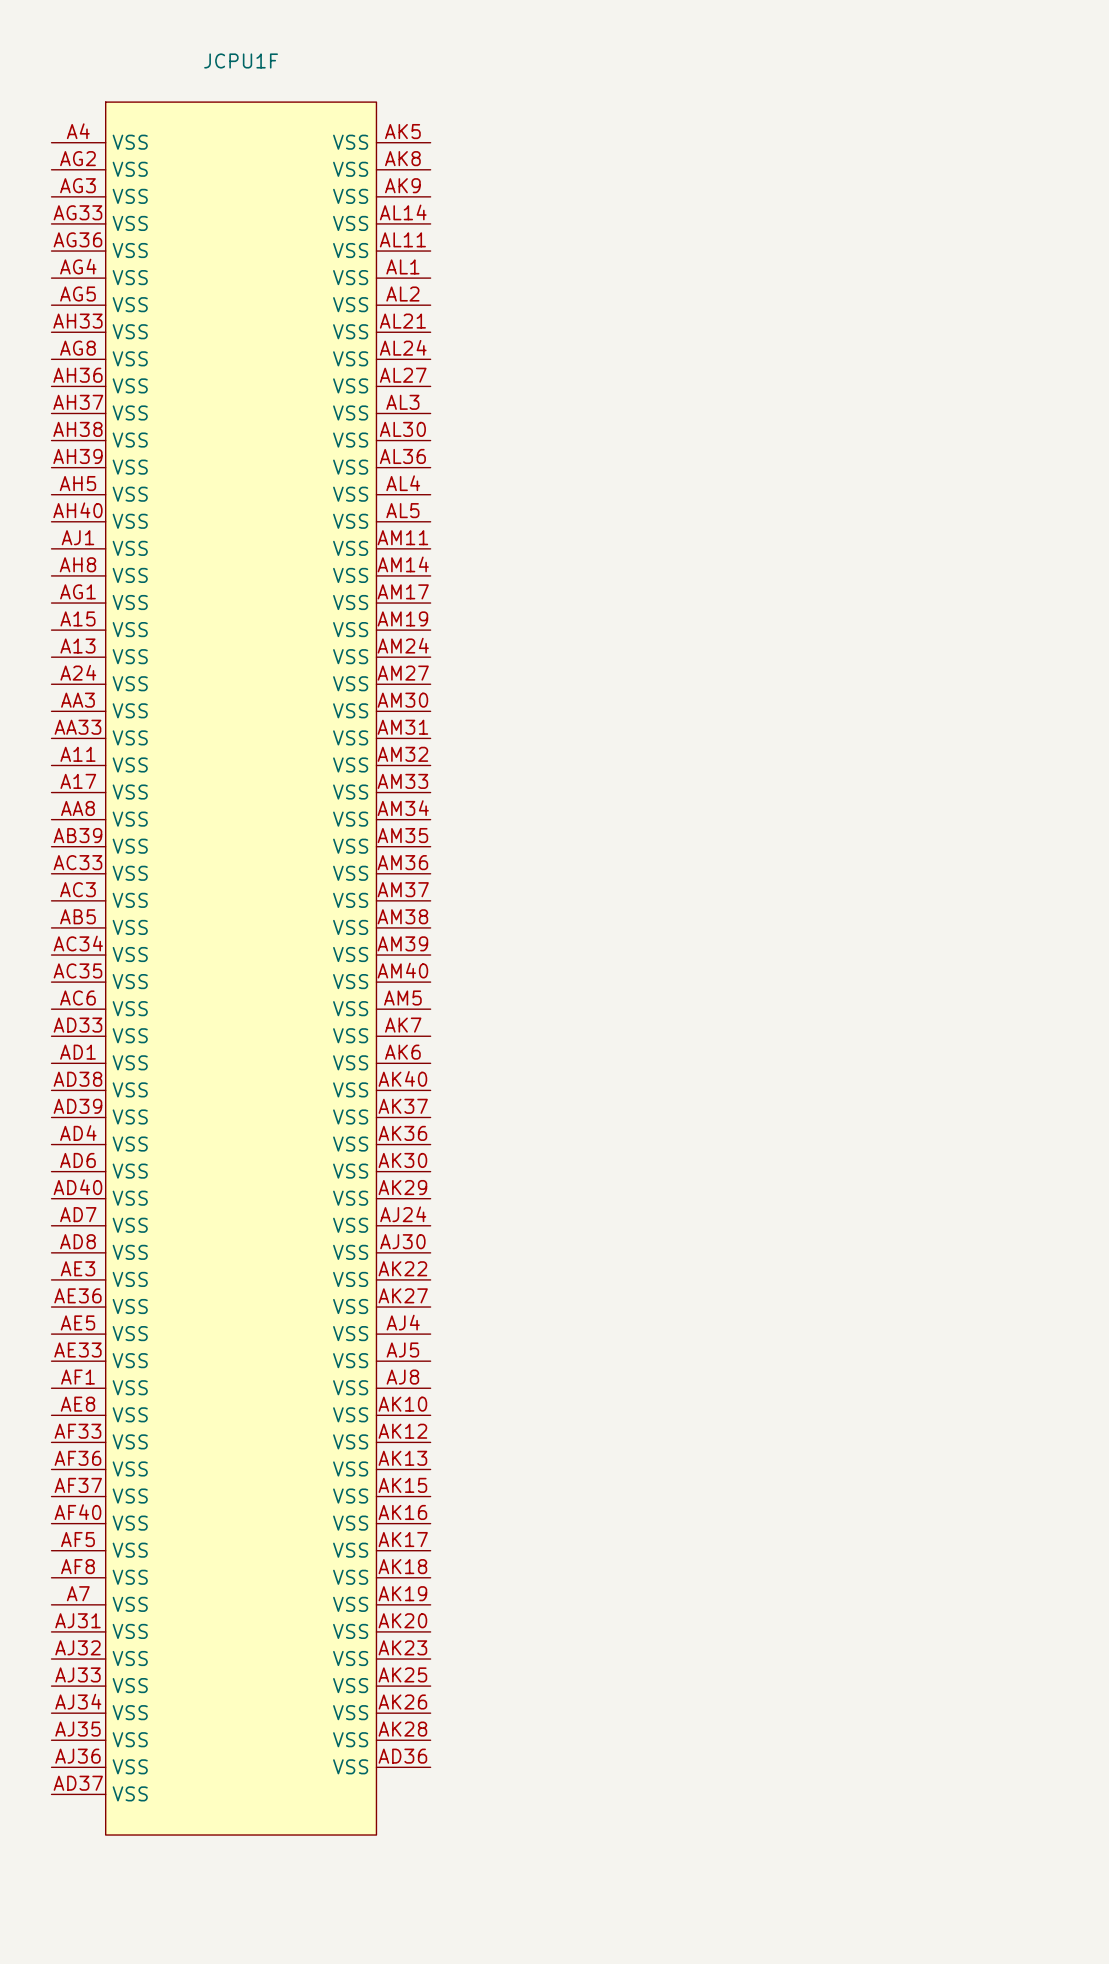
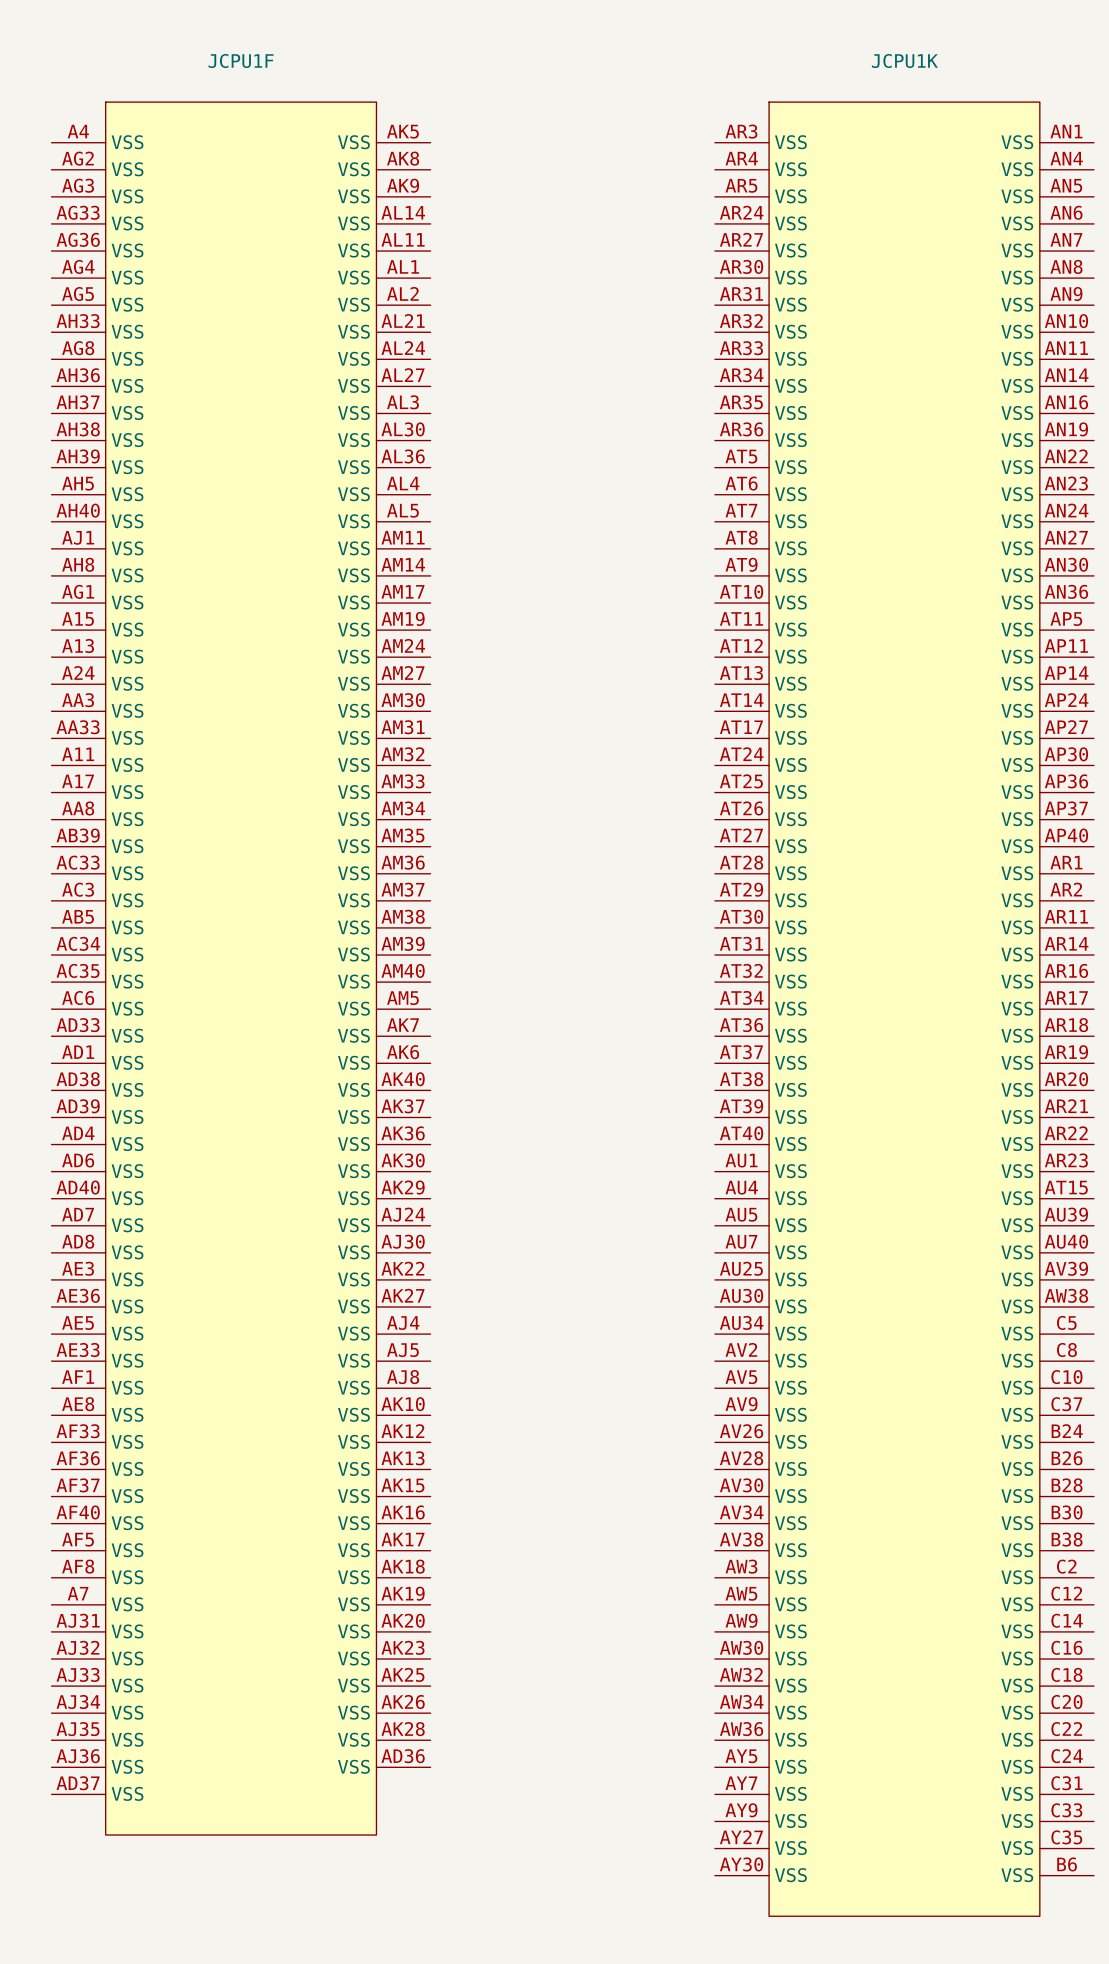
JCPU1K: none -> (904, 1009)

